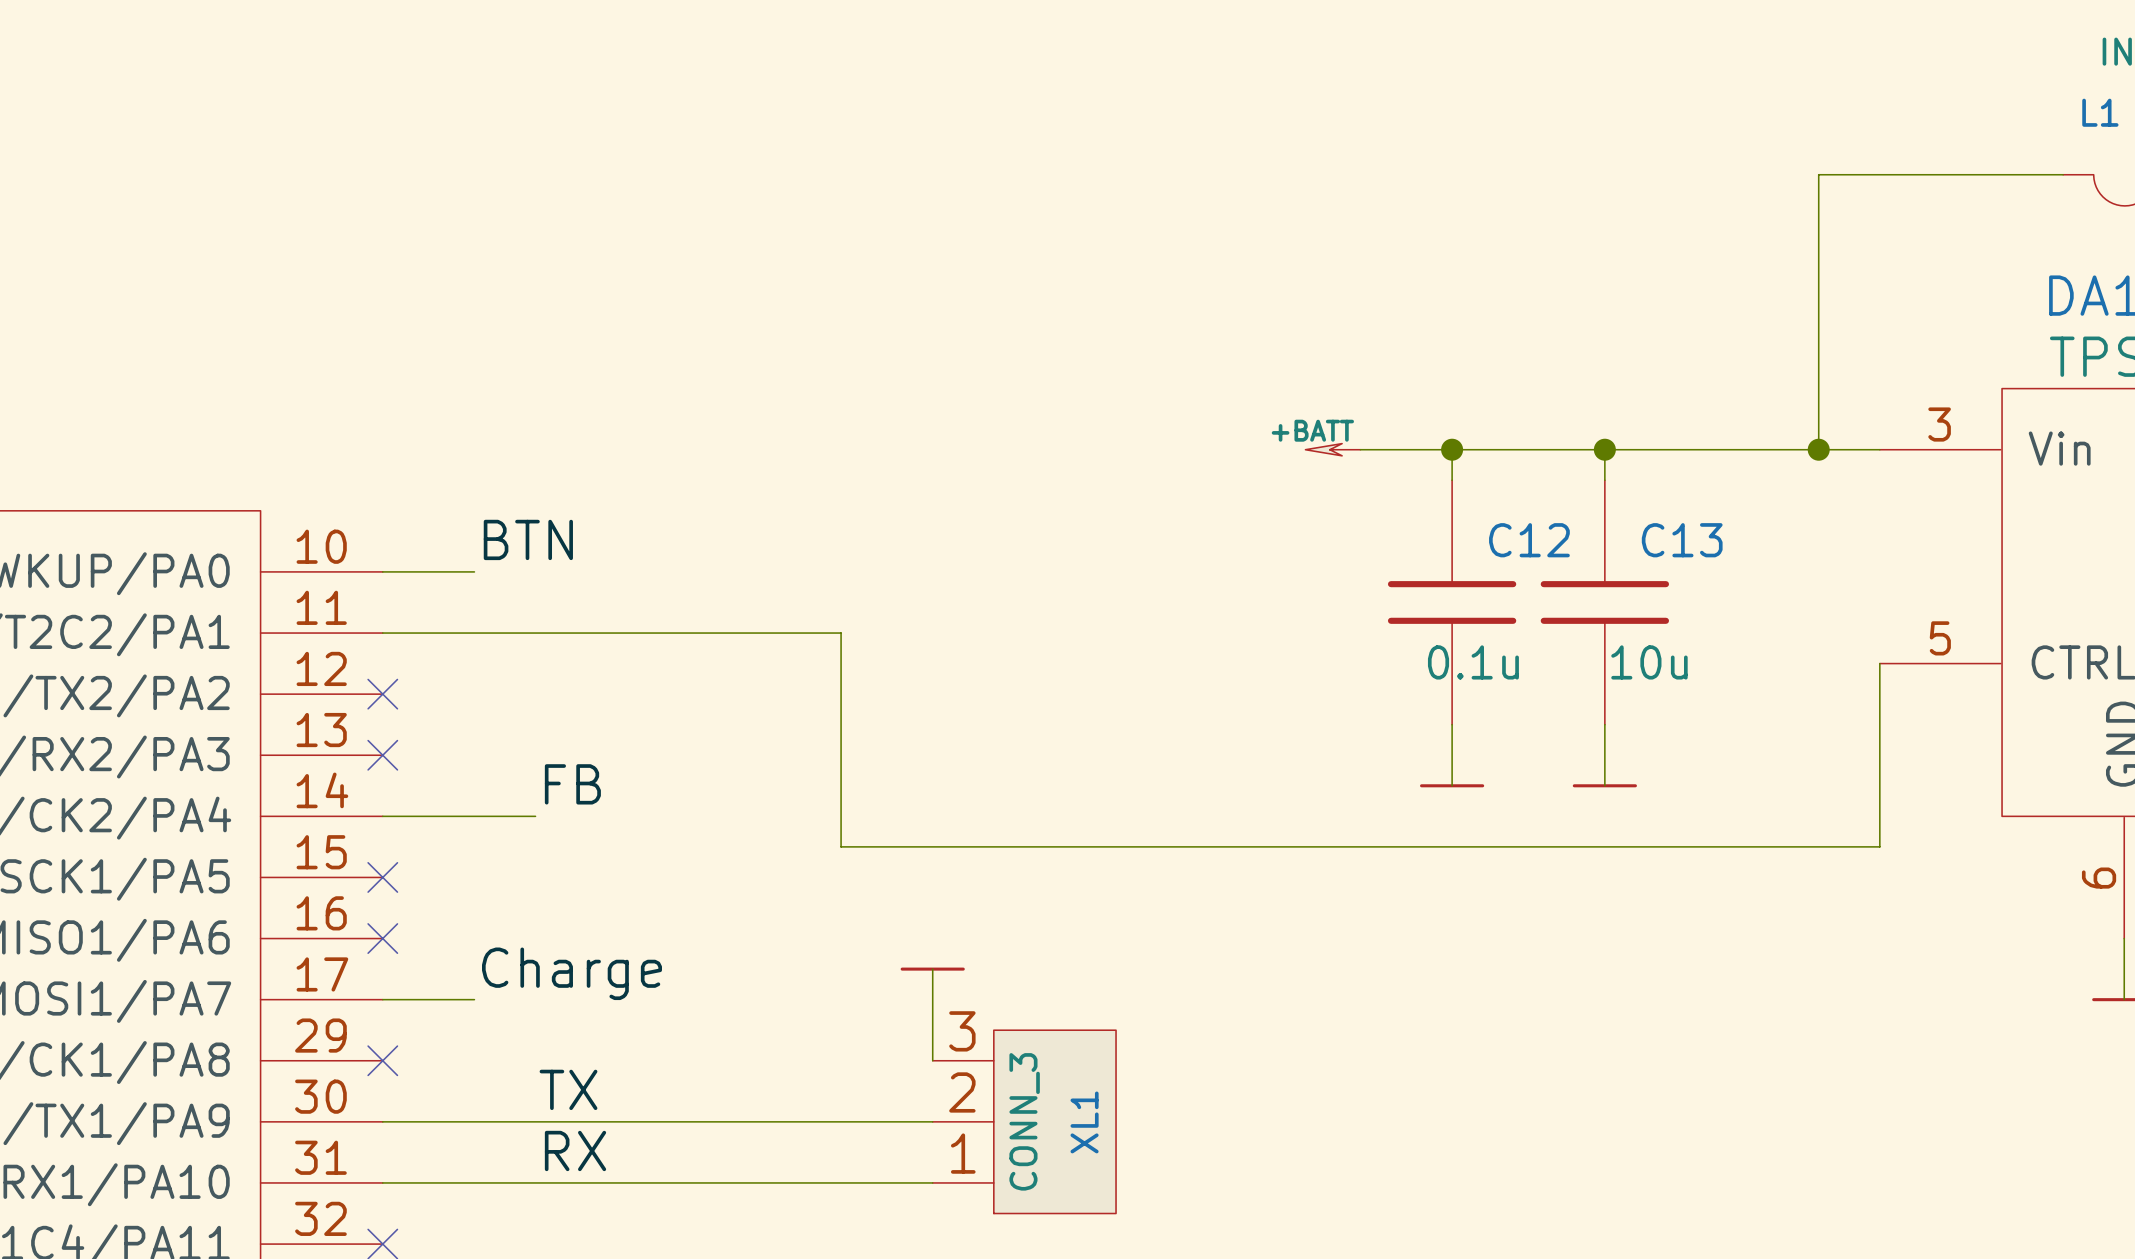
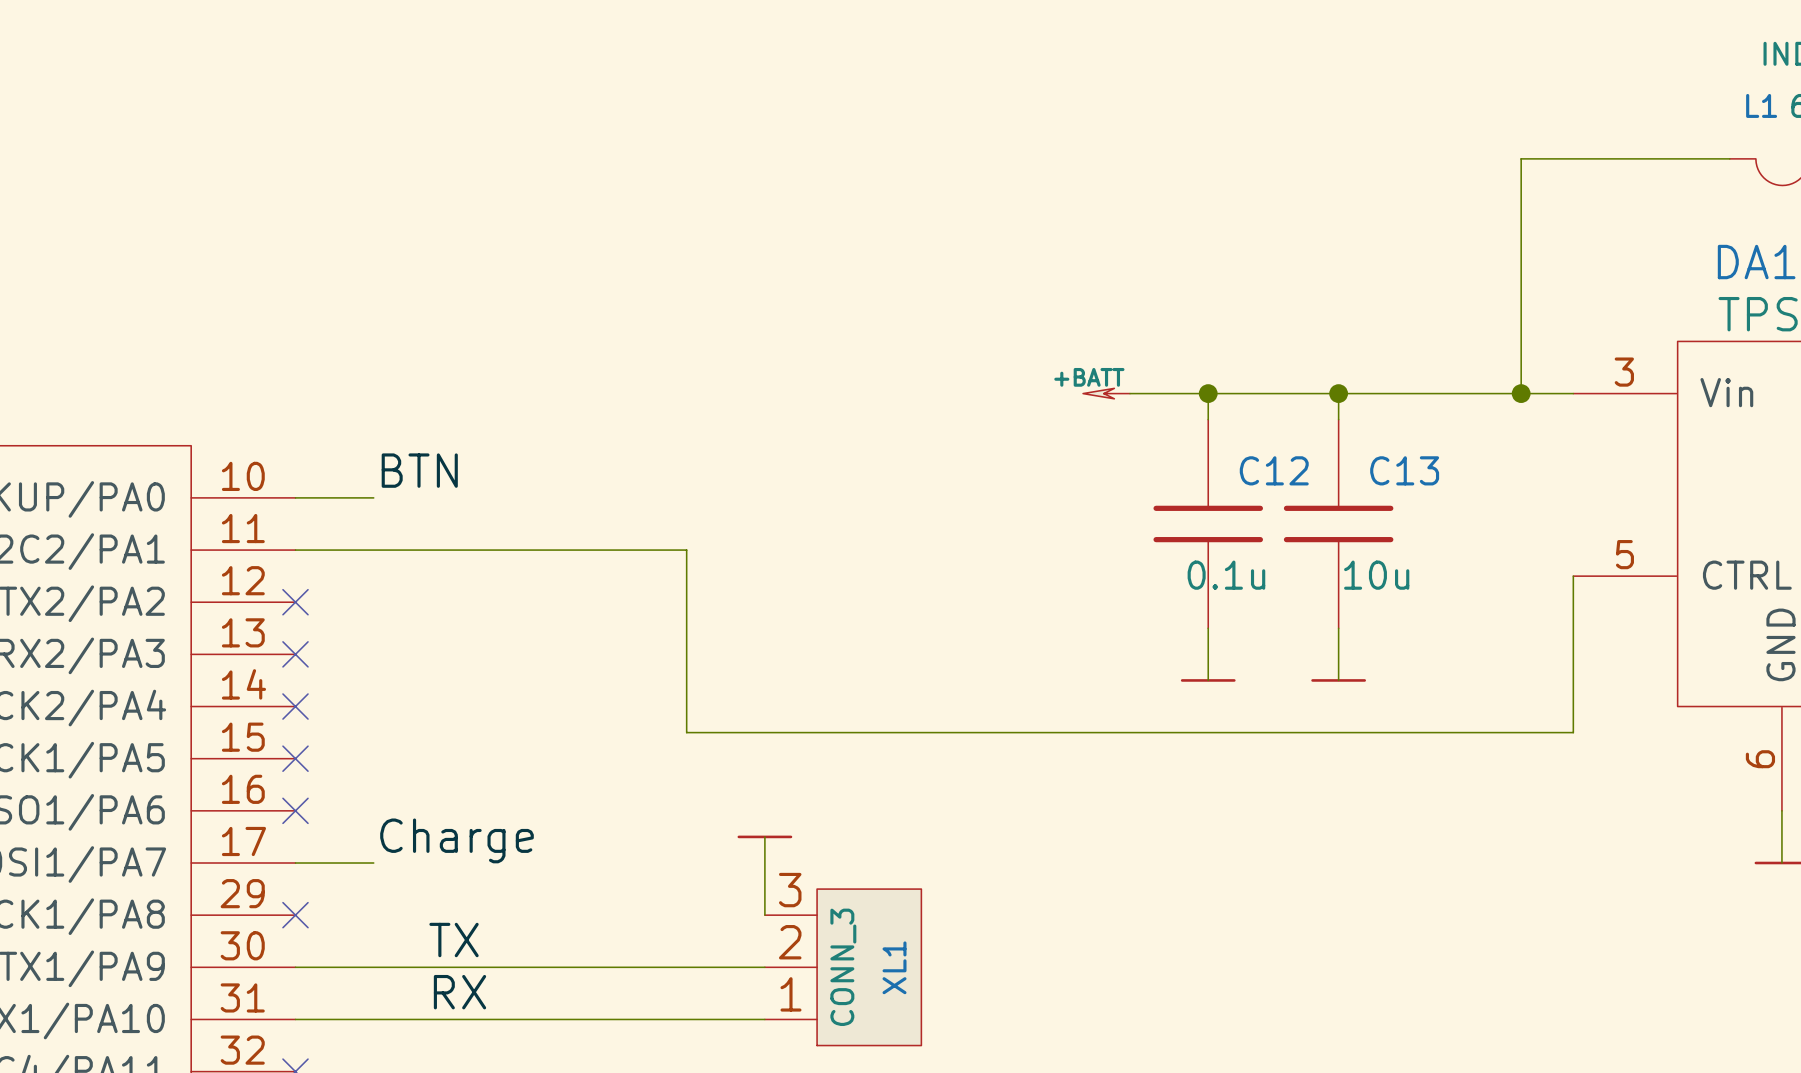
label: FB (572, 784) -> none
wire: (382, 816) (535, 816) -> none
no-connect mark: none -> (295, 706)

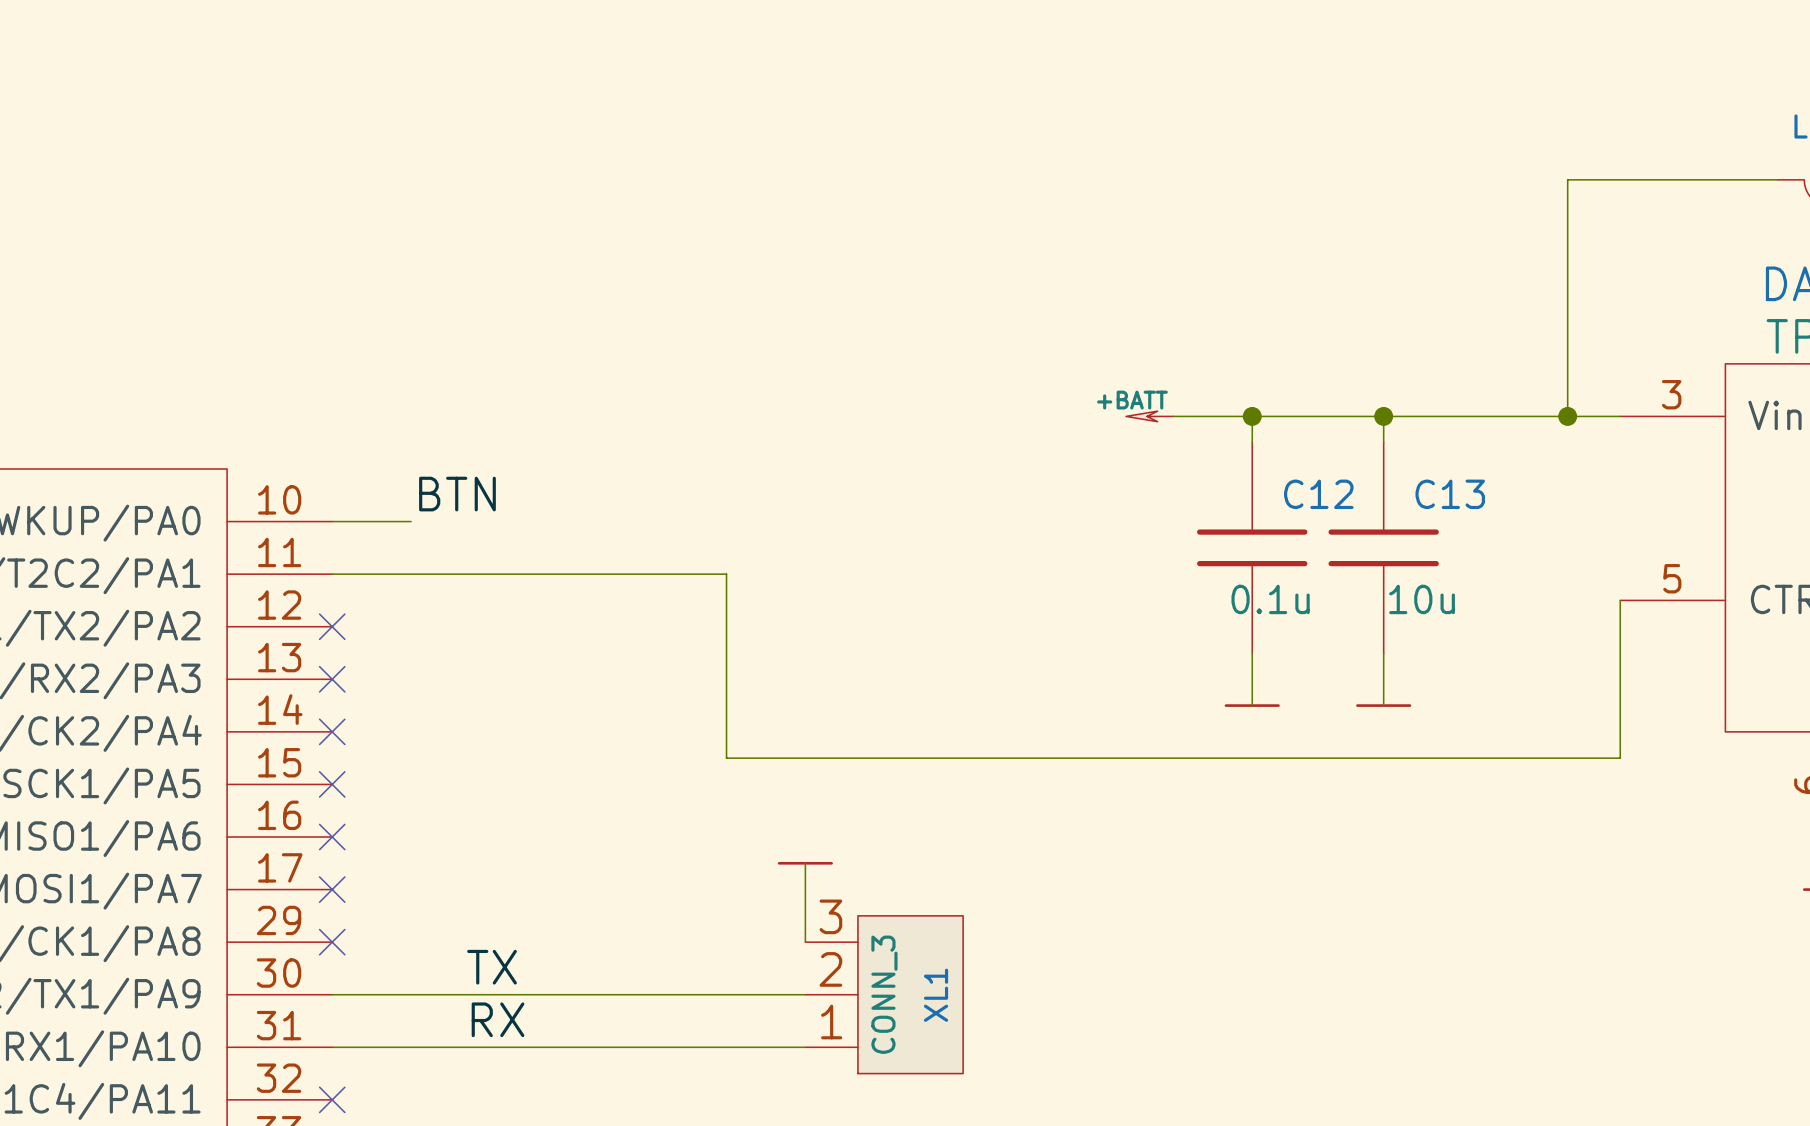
label: Charge (457, 840) -> none
wire: (295, 863) (373, 863) -> none
no-connect mark: none -> (332, 889)

